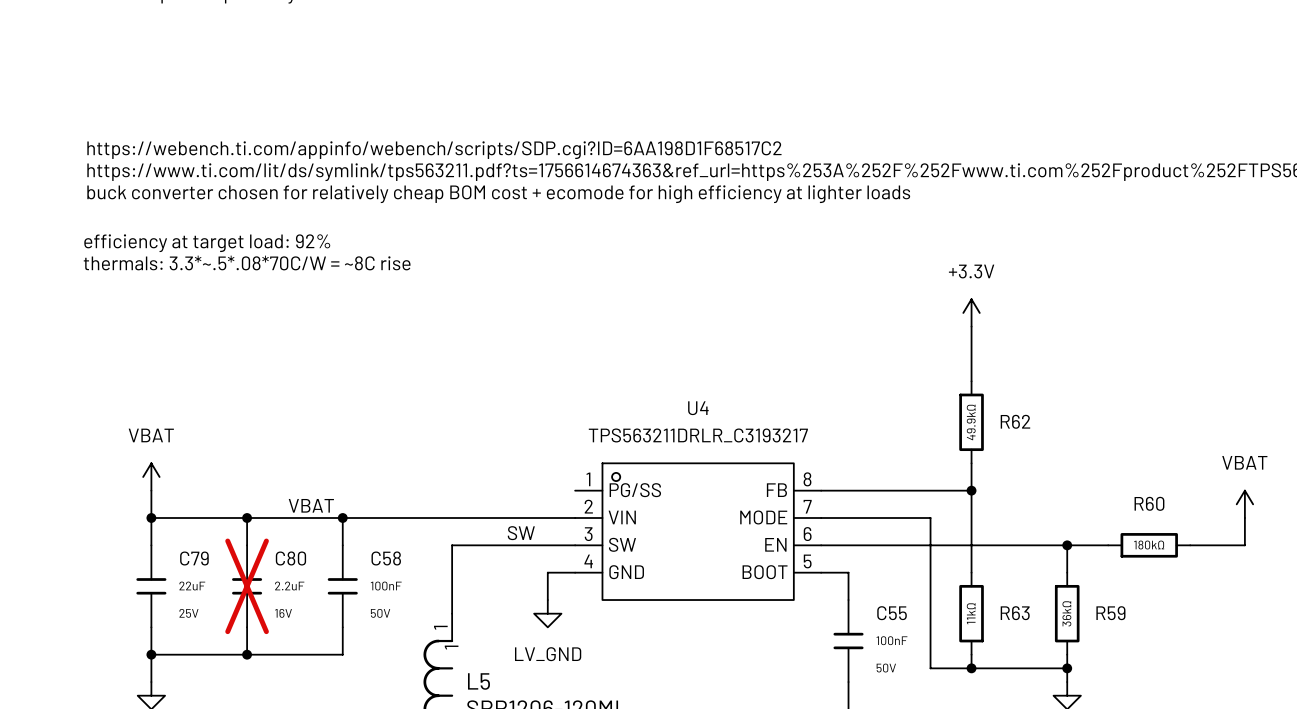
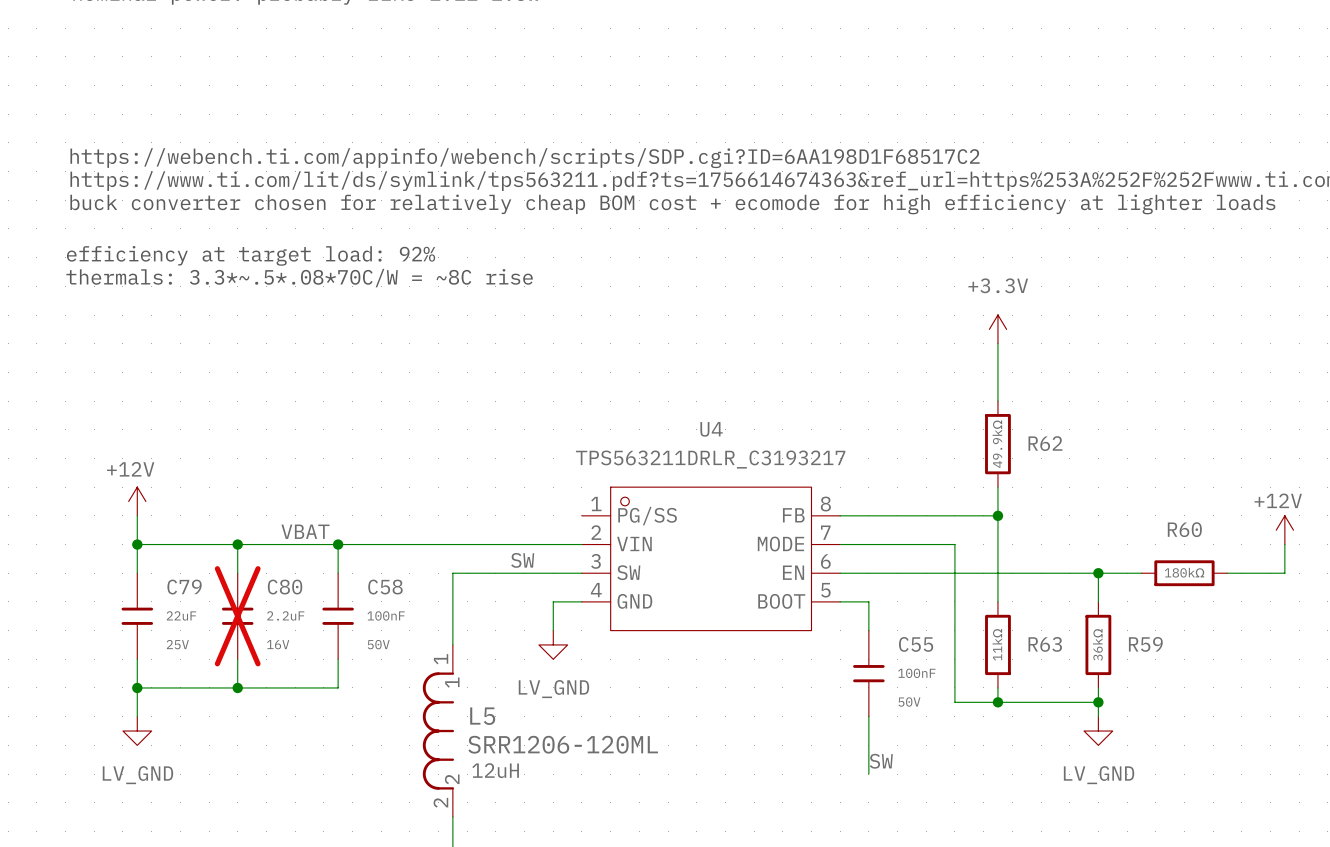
power symbol: VBAT (151, 476) -> +12V (137, 501)
power symbol: VBAT (1244, 504) -> +12V (1284, 530)

